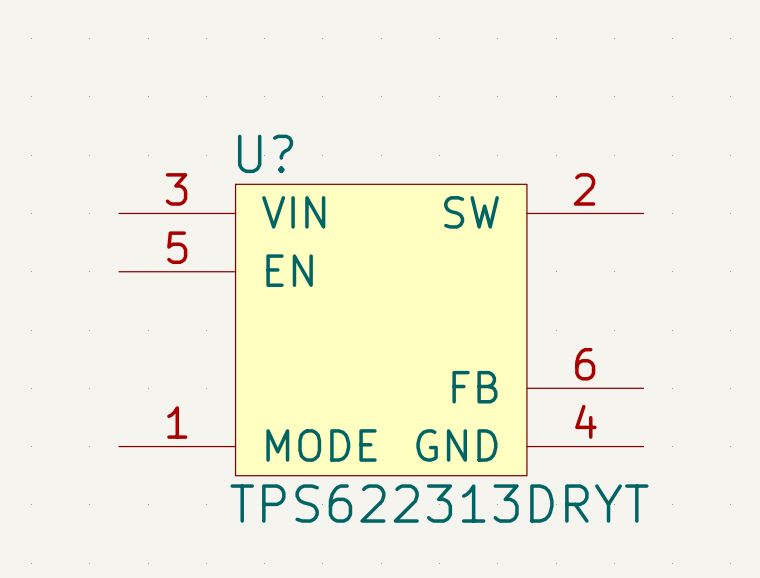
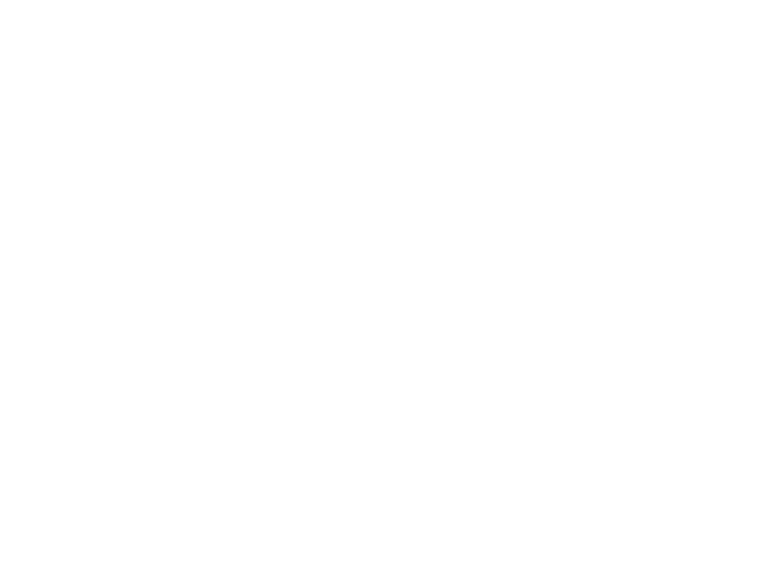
U?: TPS622313DRYT (381, 330) -> none

